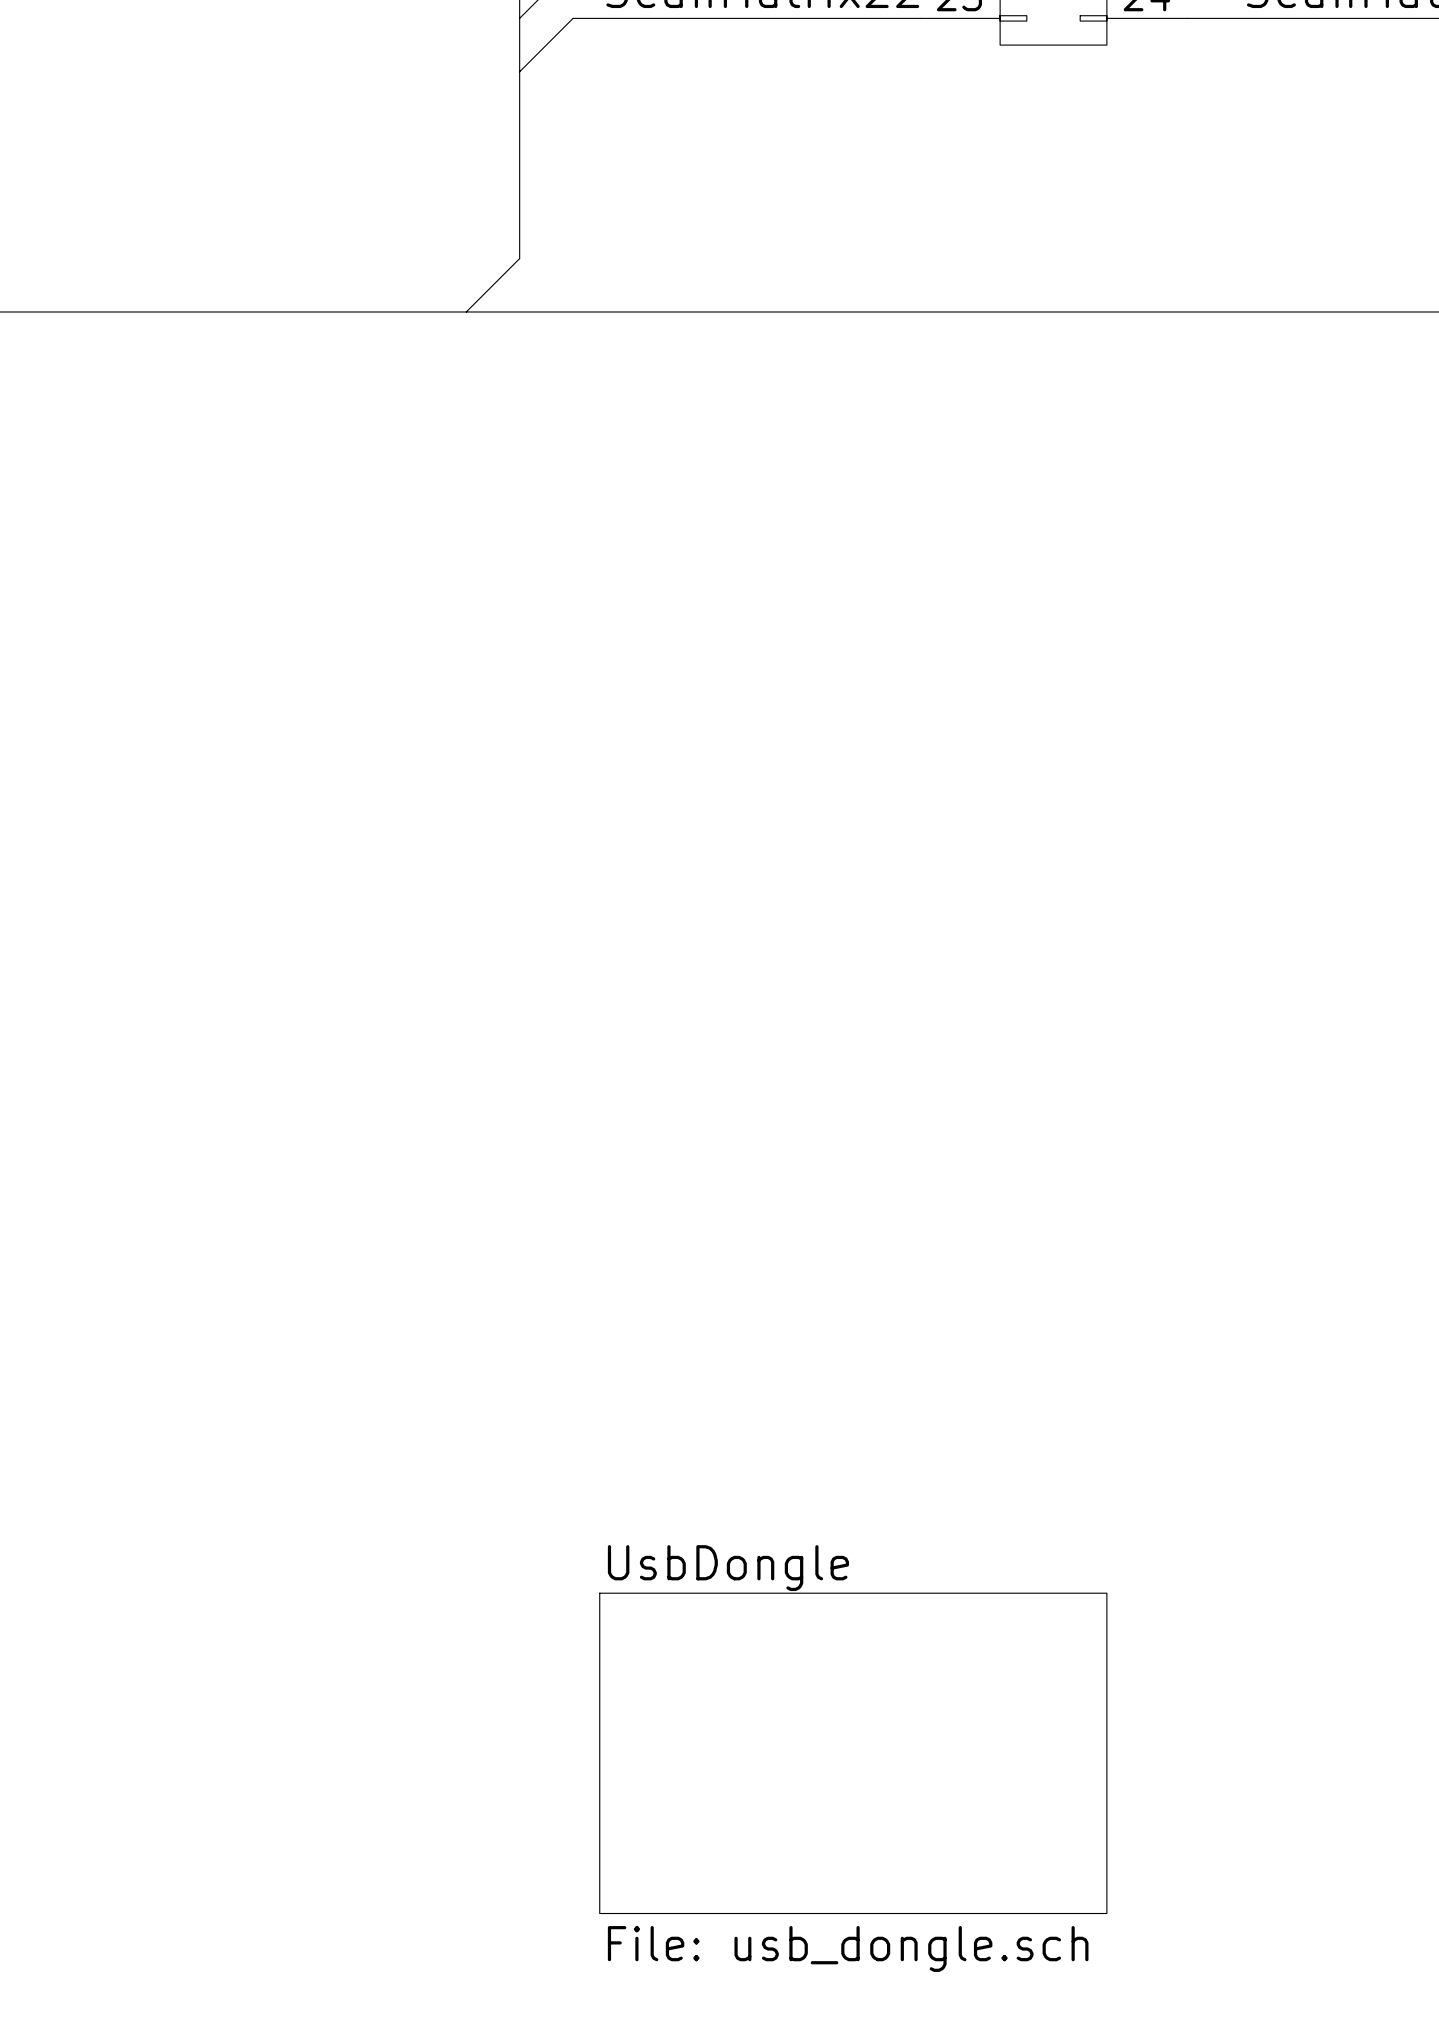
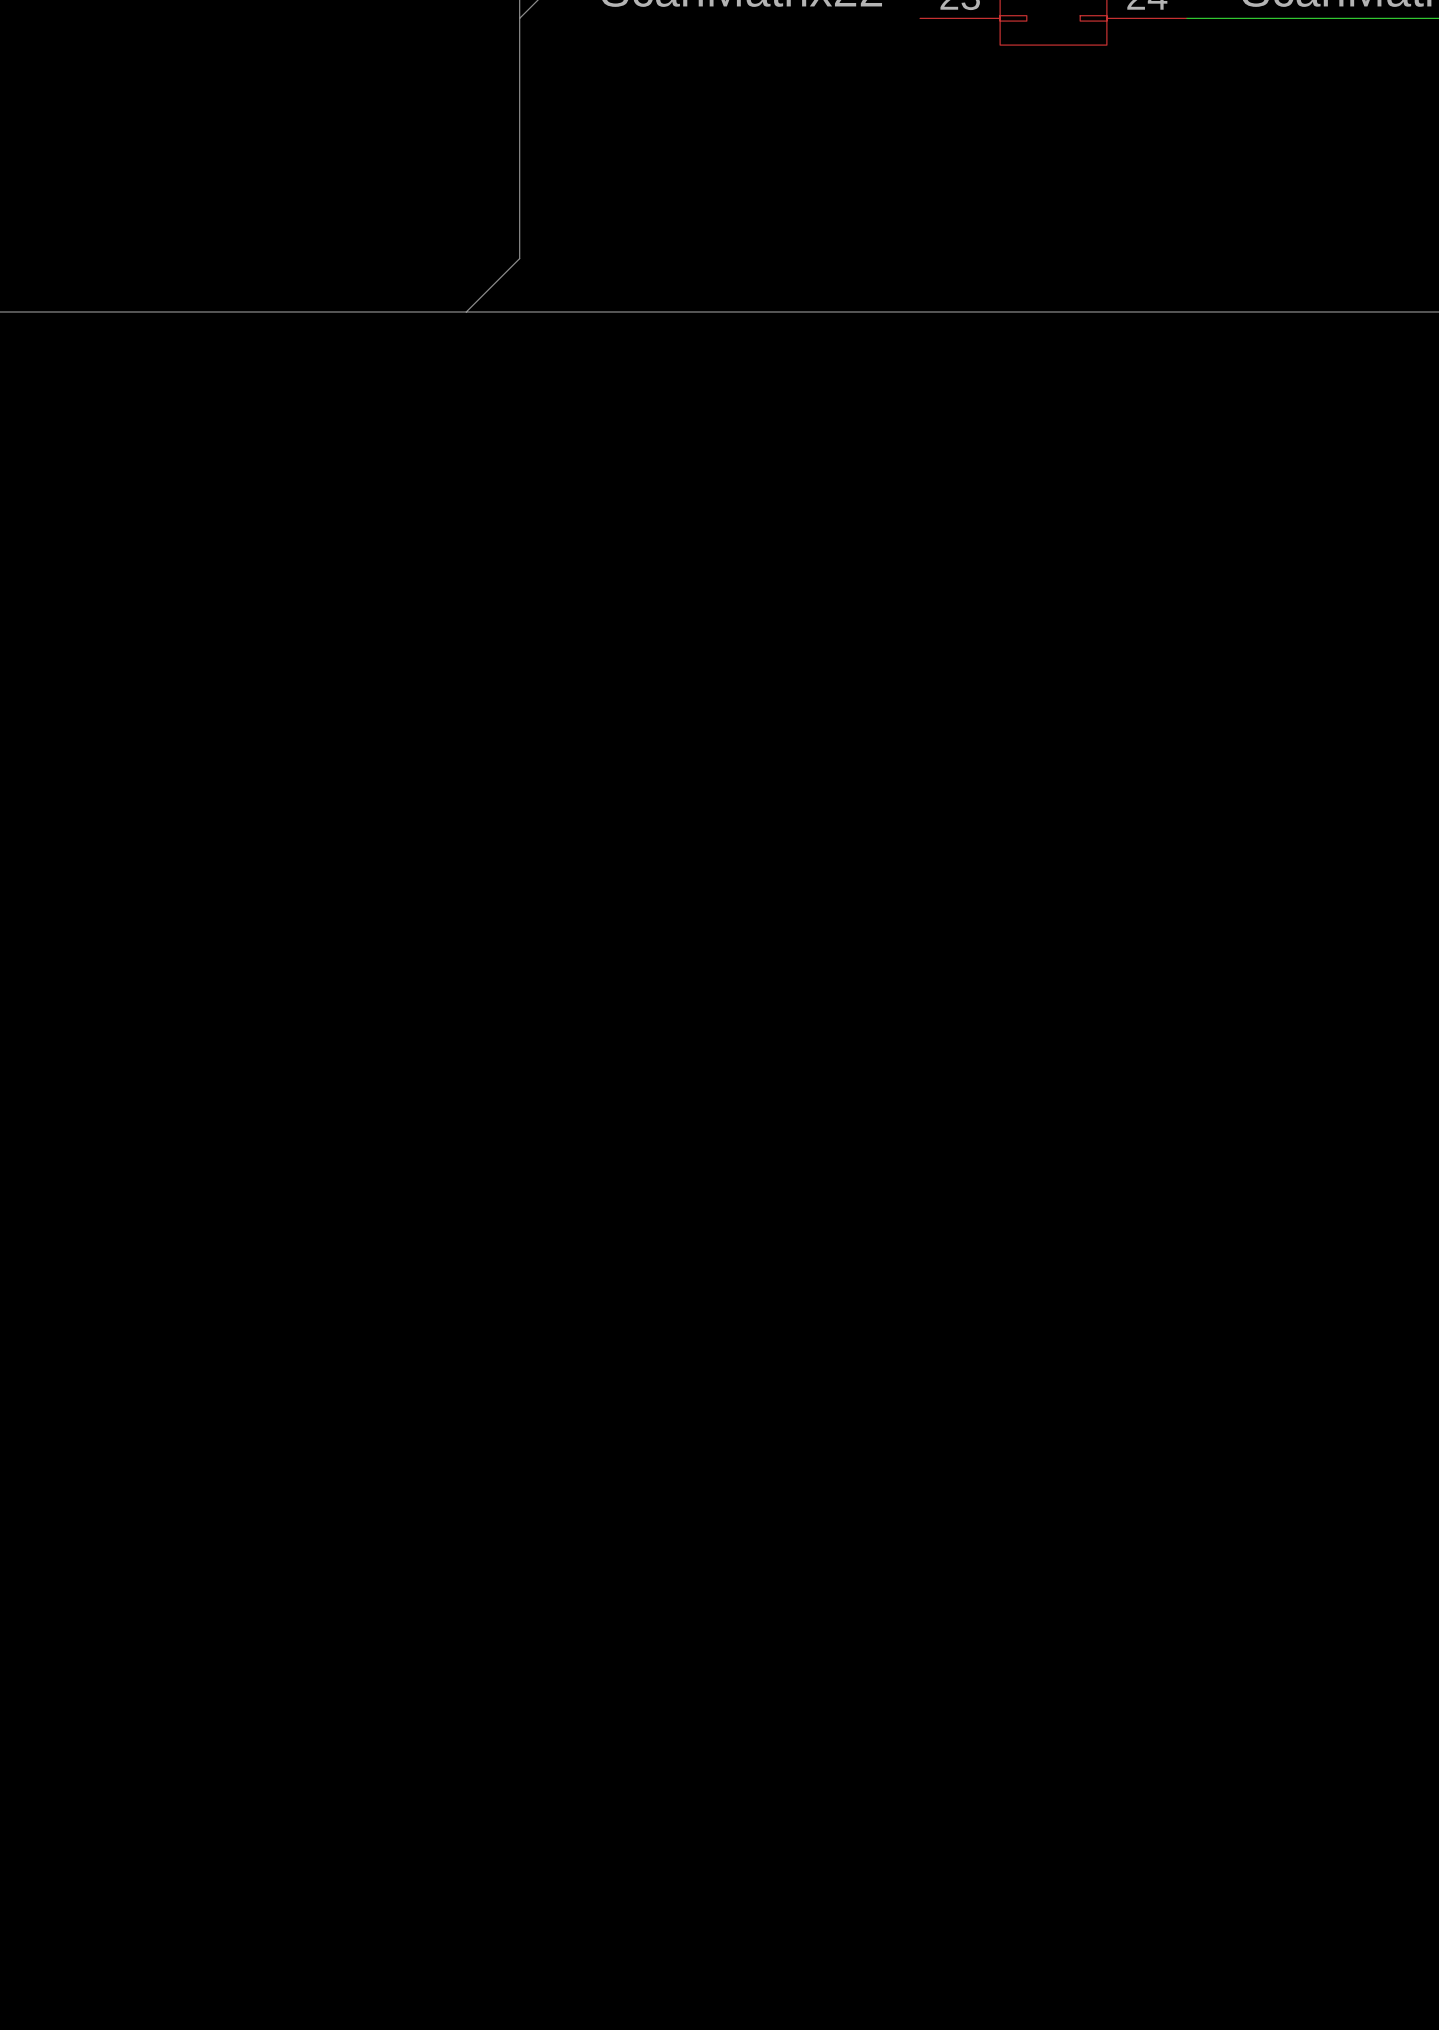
wire: (573, 18) (920, 18) -> none
bus: (573, 18) (519, 71) -> none
sheet UsbDongle: File: usb_dongle.sch (853, 1753) -> none

